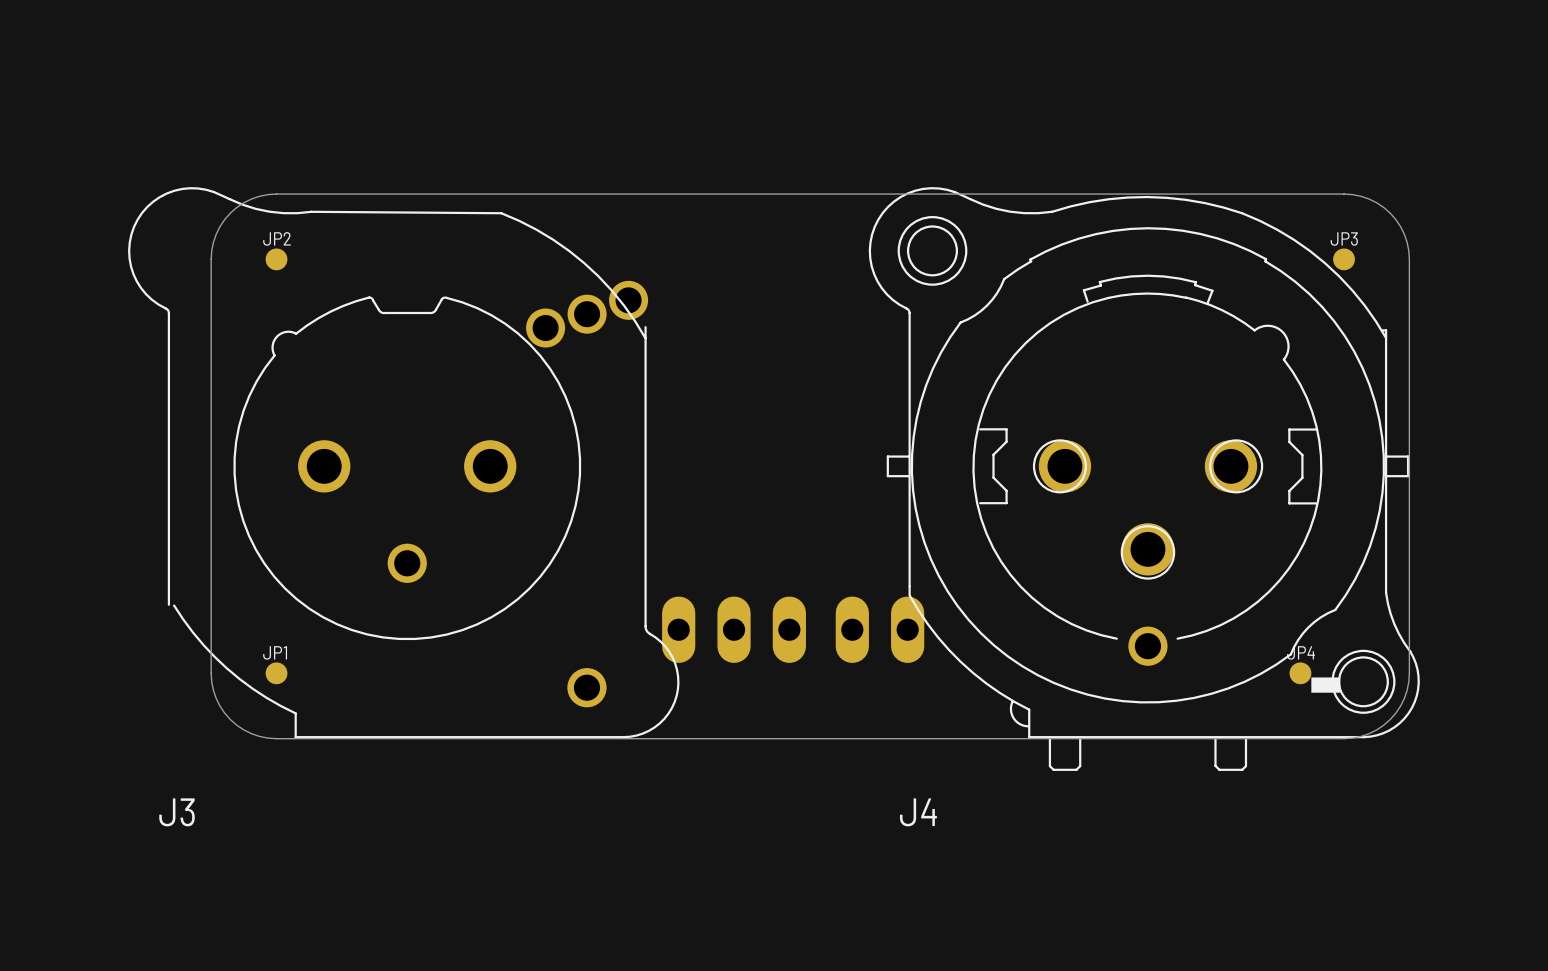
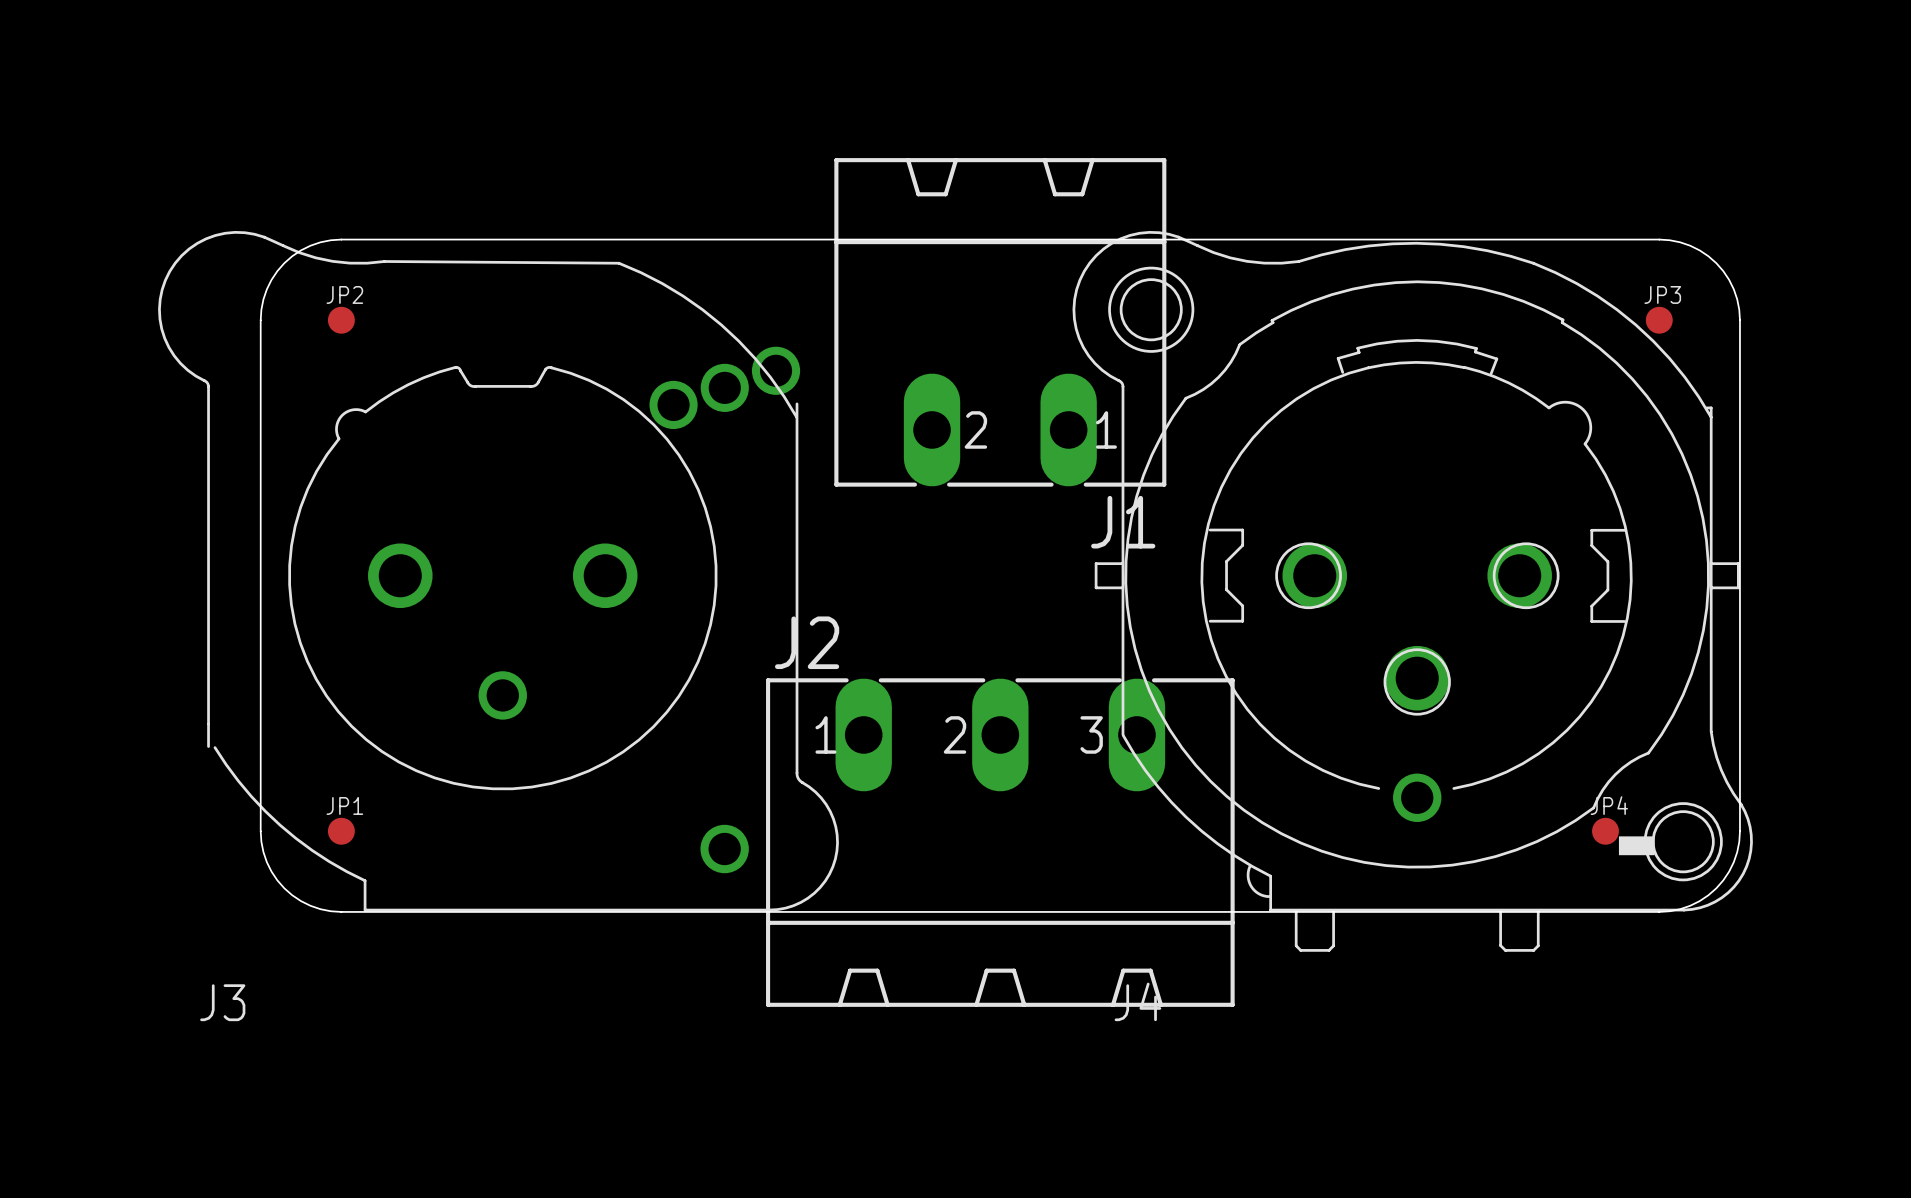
J1: none -> (1000, 322)
part: (734, 629) -> none
part: (879, 629) -> none
J2: none -> (1000, 842)

